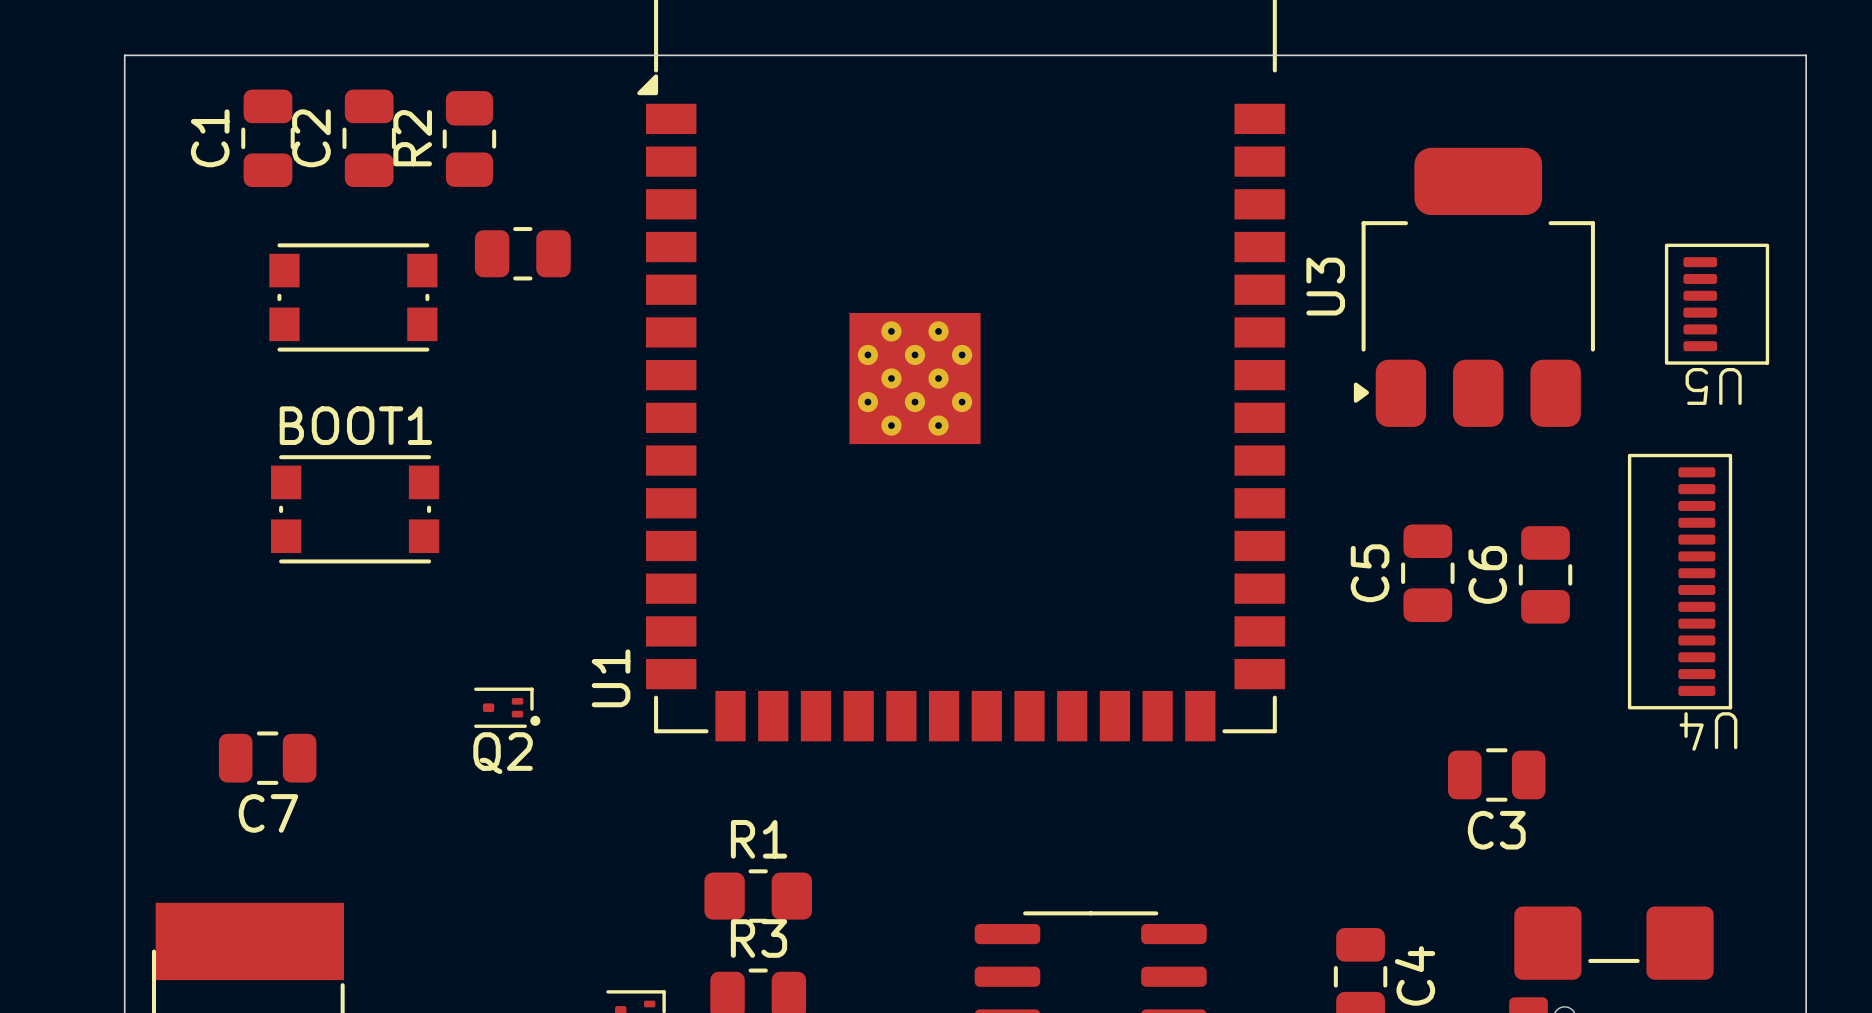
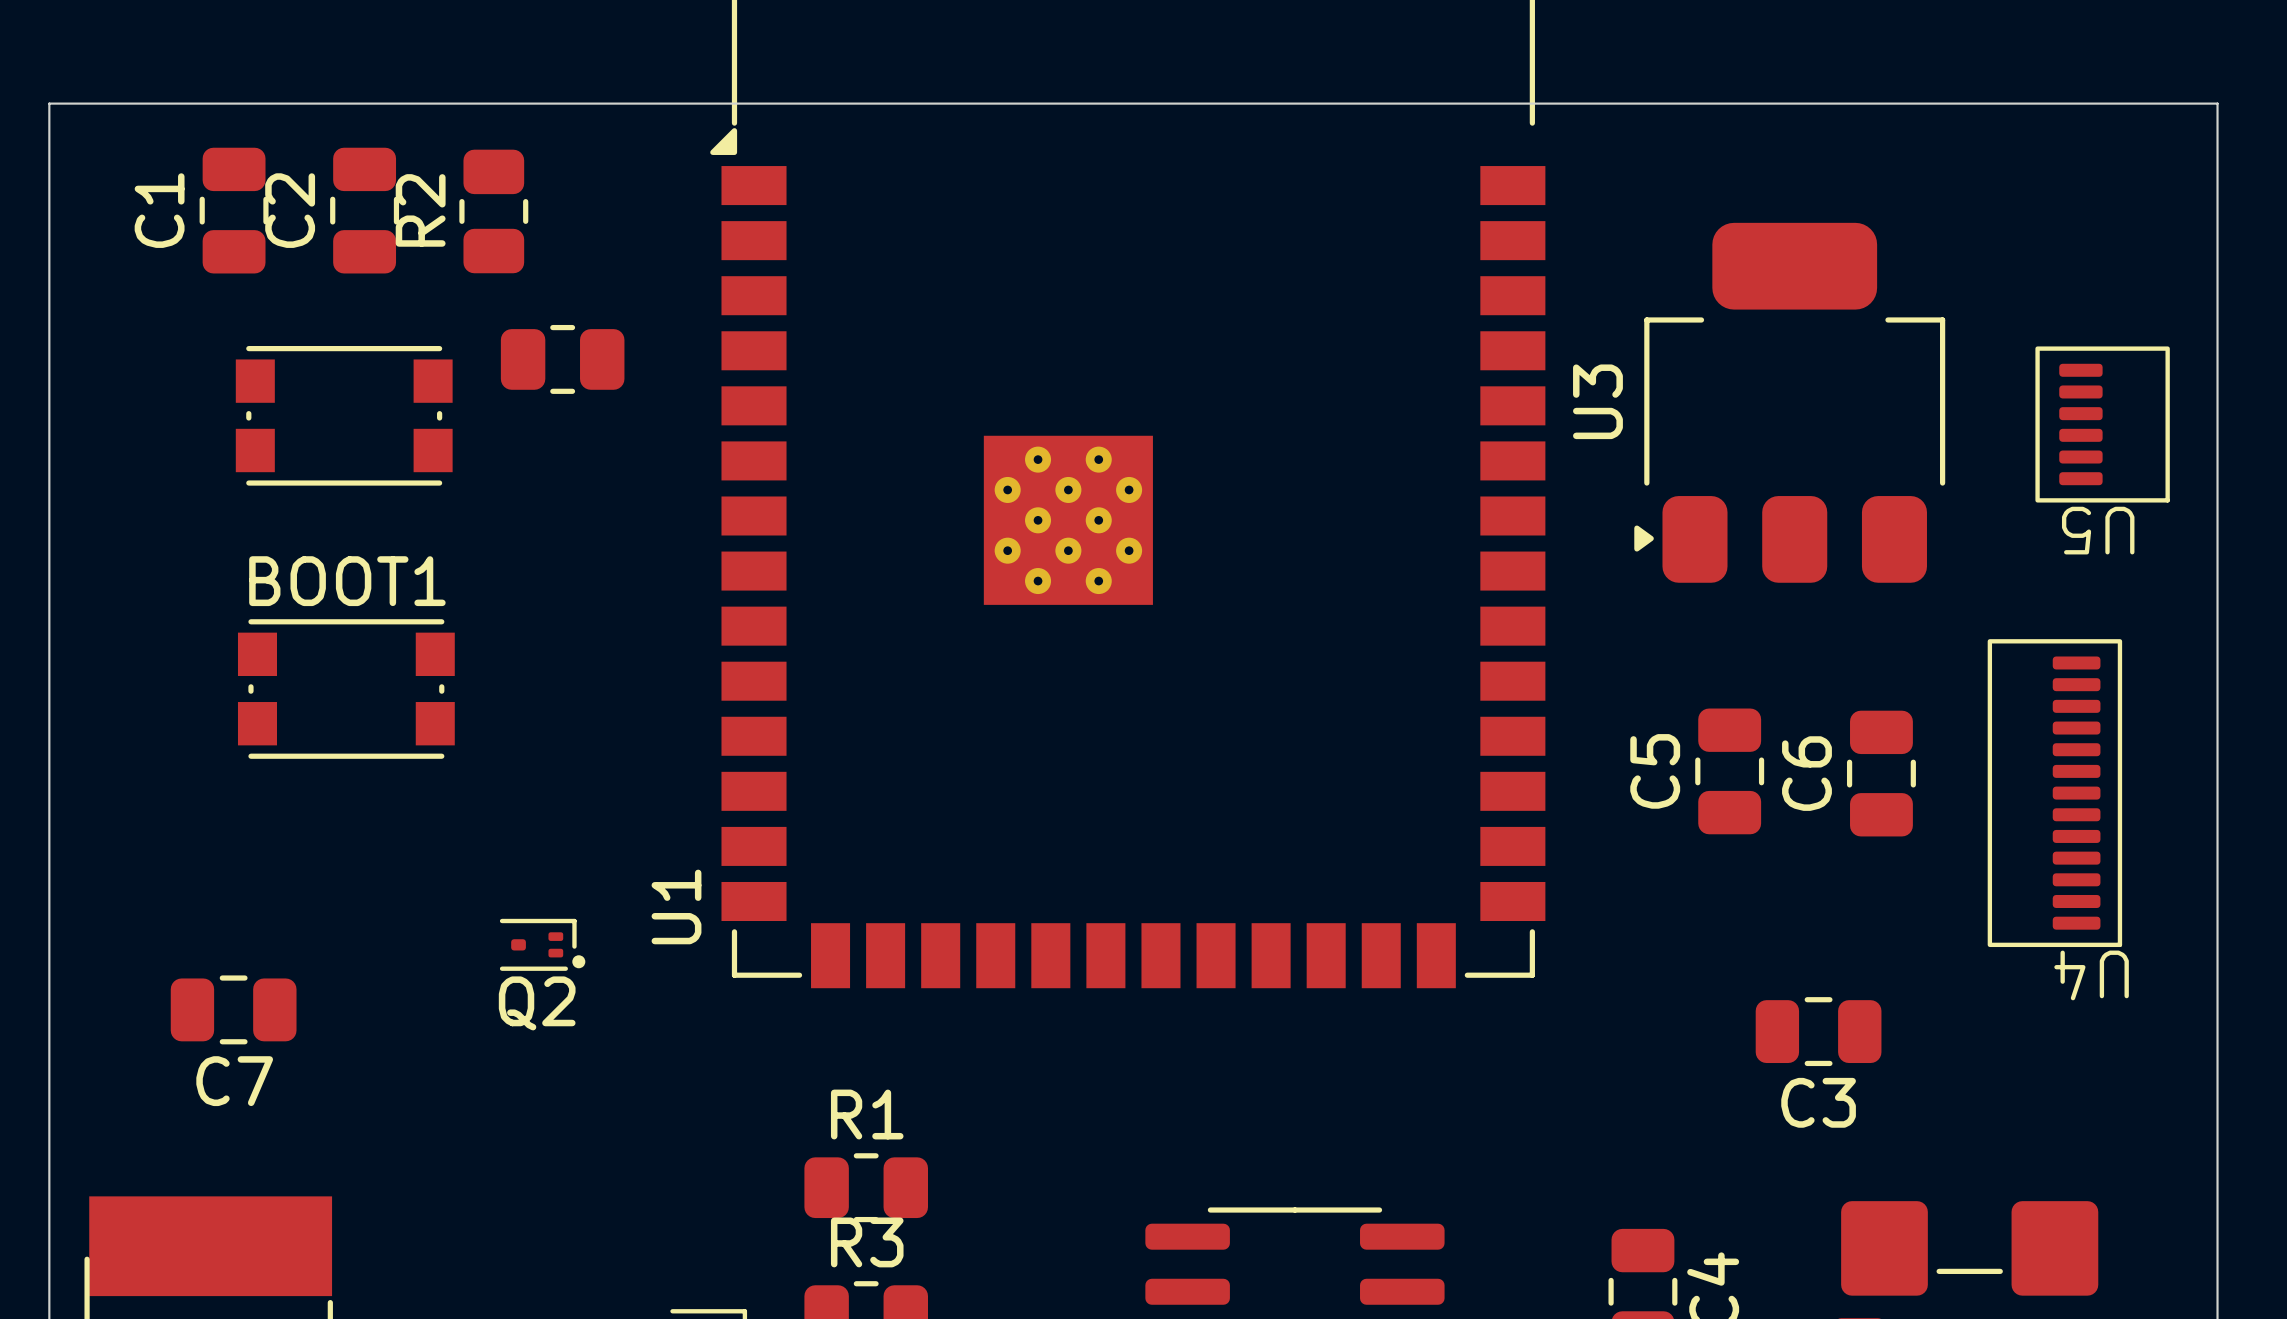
U4 footprint: [1627, 453, 1733, 710] -> [1987, 639, 2123, 948]
R1 footprint: [704, 869, 813, 923] -> [804, 1153, 929, 1223]

